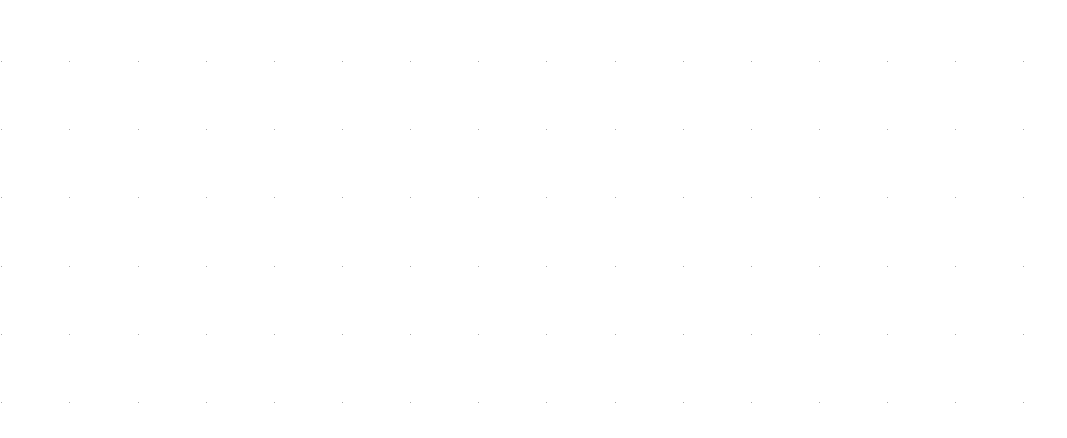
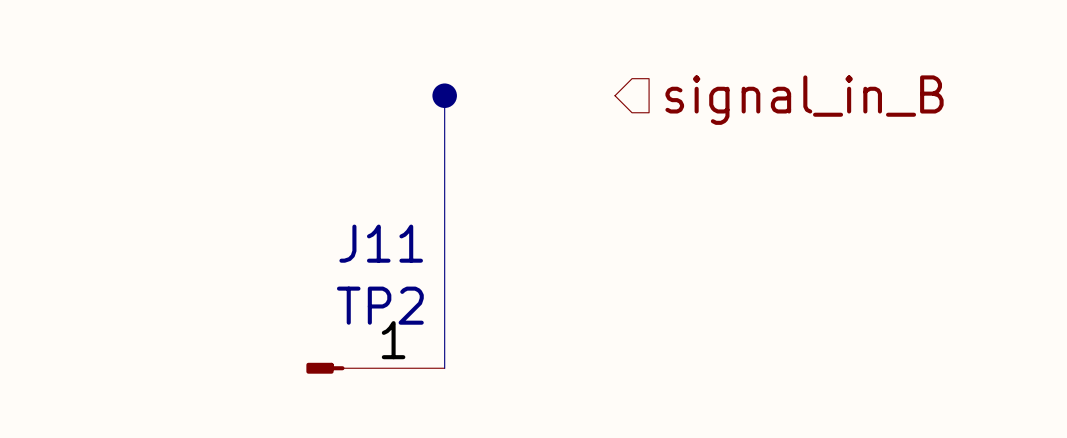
wire: none -> (444, 95) (444, 368)
junction: none -> (444, 95)
hierarchical label: none -> signal_in_B (804, 100)
J11: none -> TP2 (375, 368)

